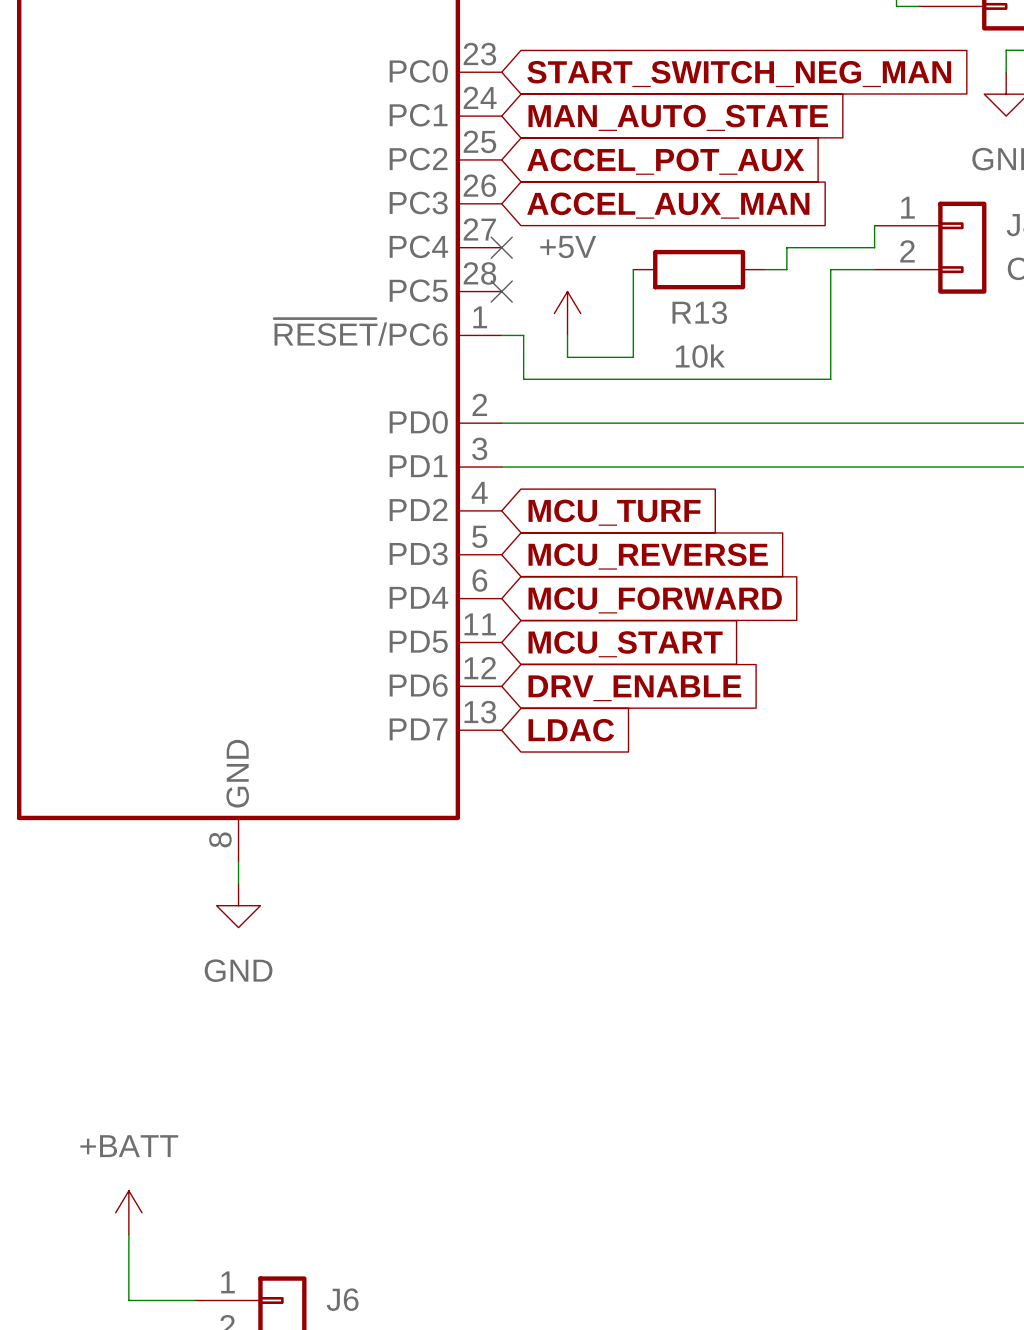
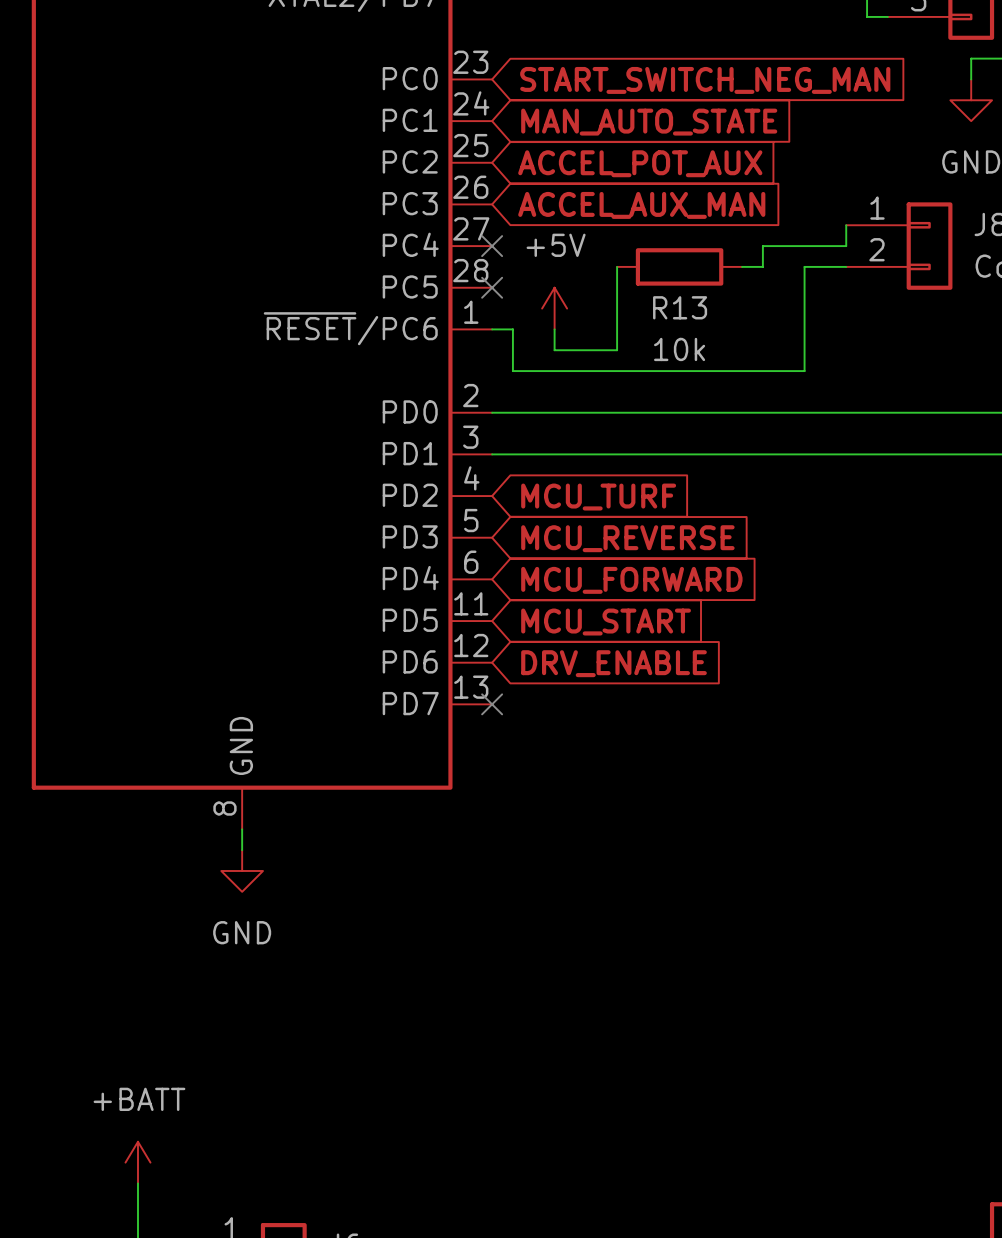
no-connect mark: none -> (492, 704)
global label: LDAC (571, 730) -> none

